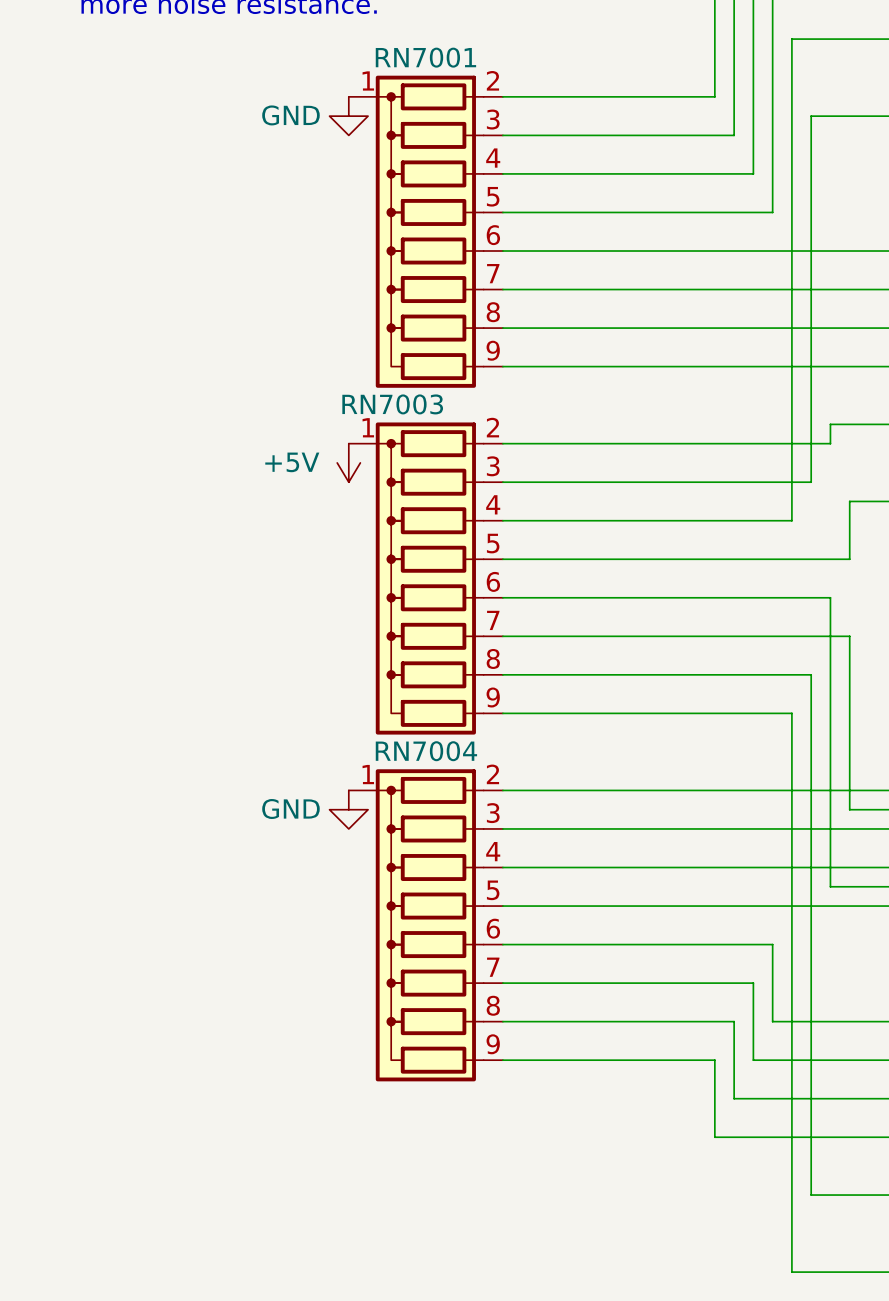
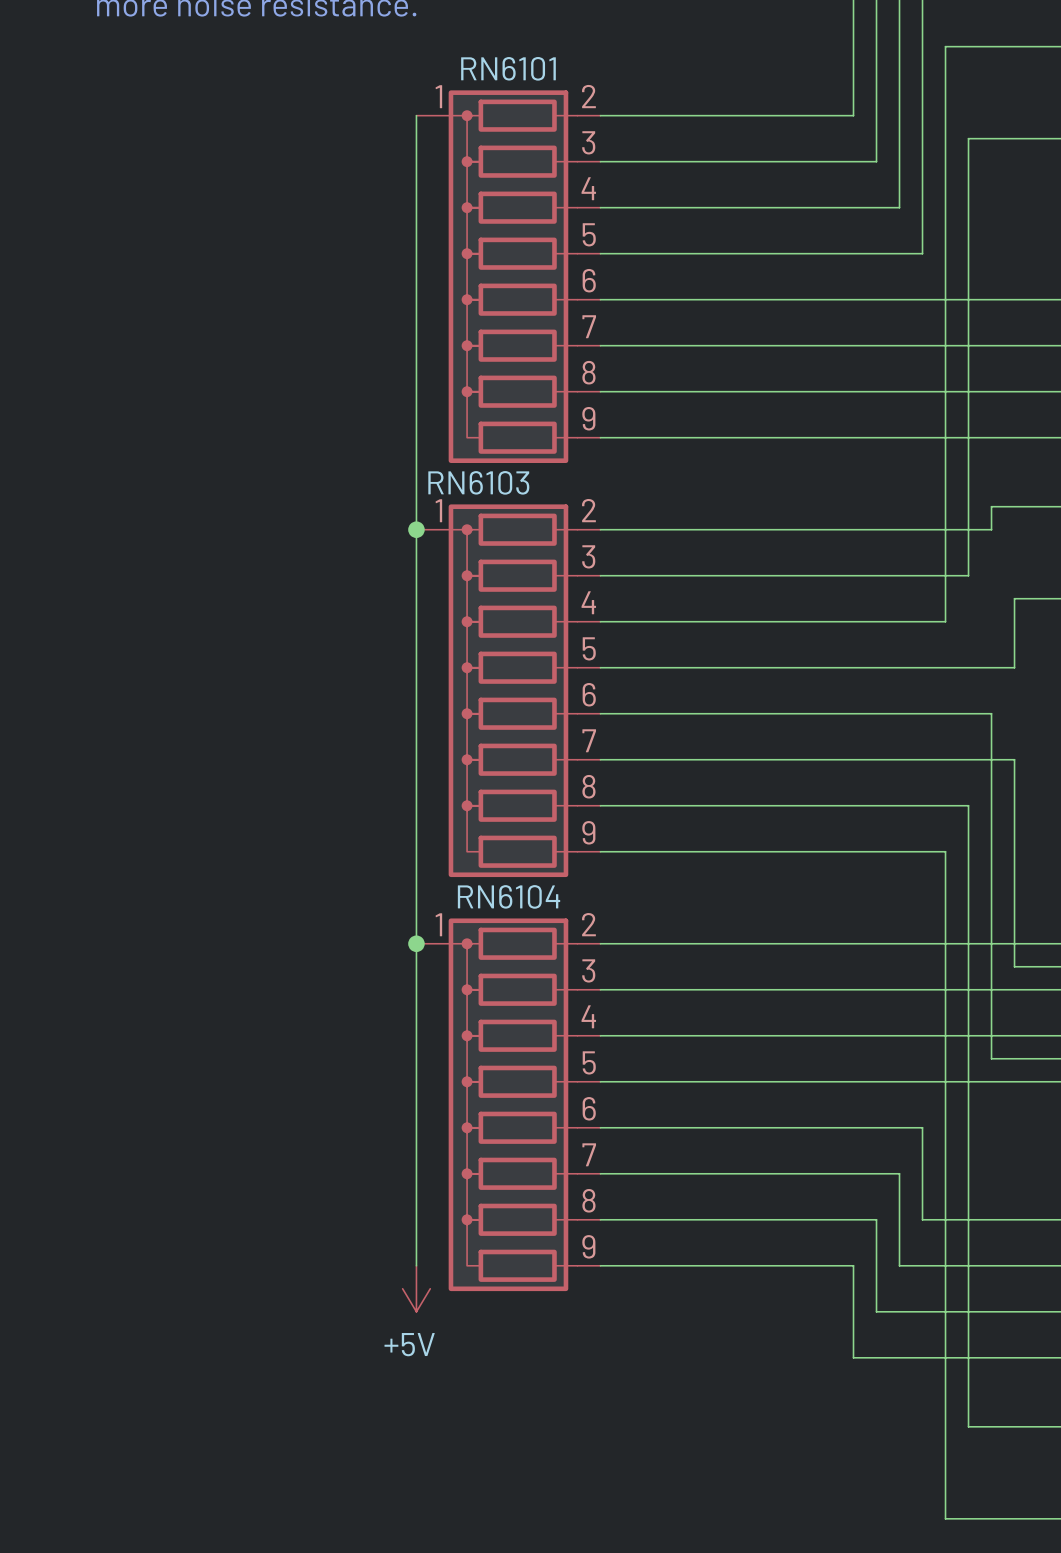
RN7001 name: RN7001 (425, 57) -> RN6101 (508, 68)
wire: none -> (416, 115) (416, 1265)
power symbol: GND (348, 116) -> none
RN7003 name: RN7003 (392, 404) -> RN6103 (478, 482)
junction: none -> (416, 529)
power symbol: +5V (348, 462) -> none
RN7004 name: RN7004 (426, 751) -> RN6104 (509, 896)
junction: none -> (416, 943)
power symbol: GND (348, 809) -> none
power symbol: none -> +5V (416, 1288)

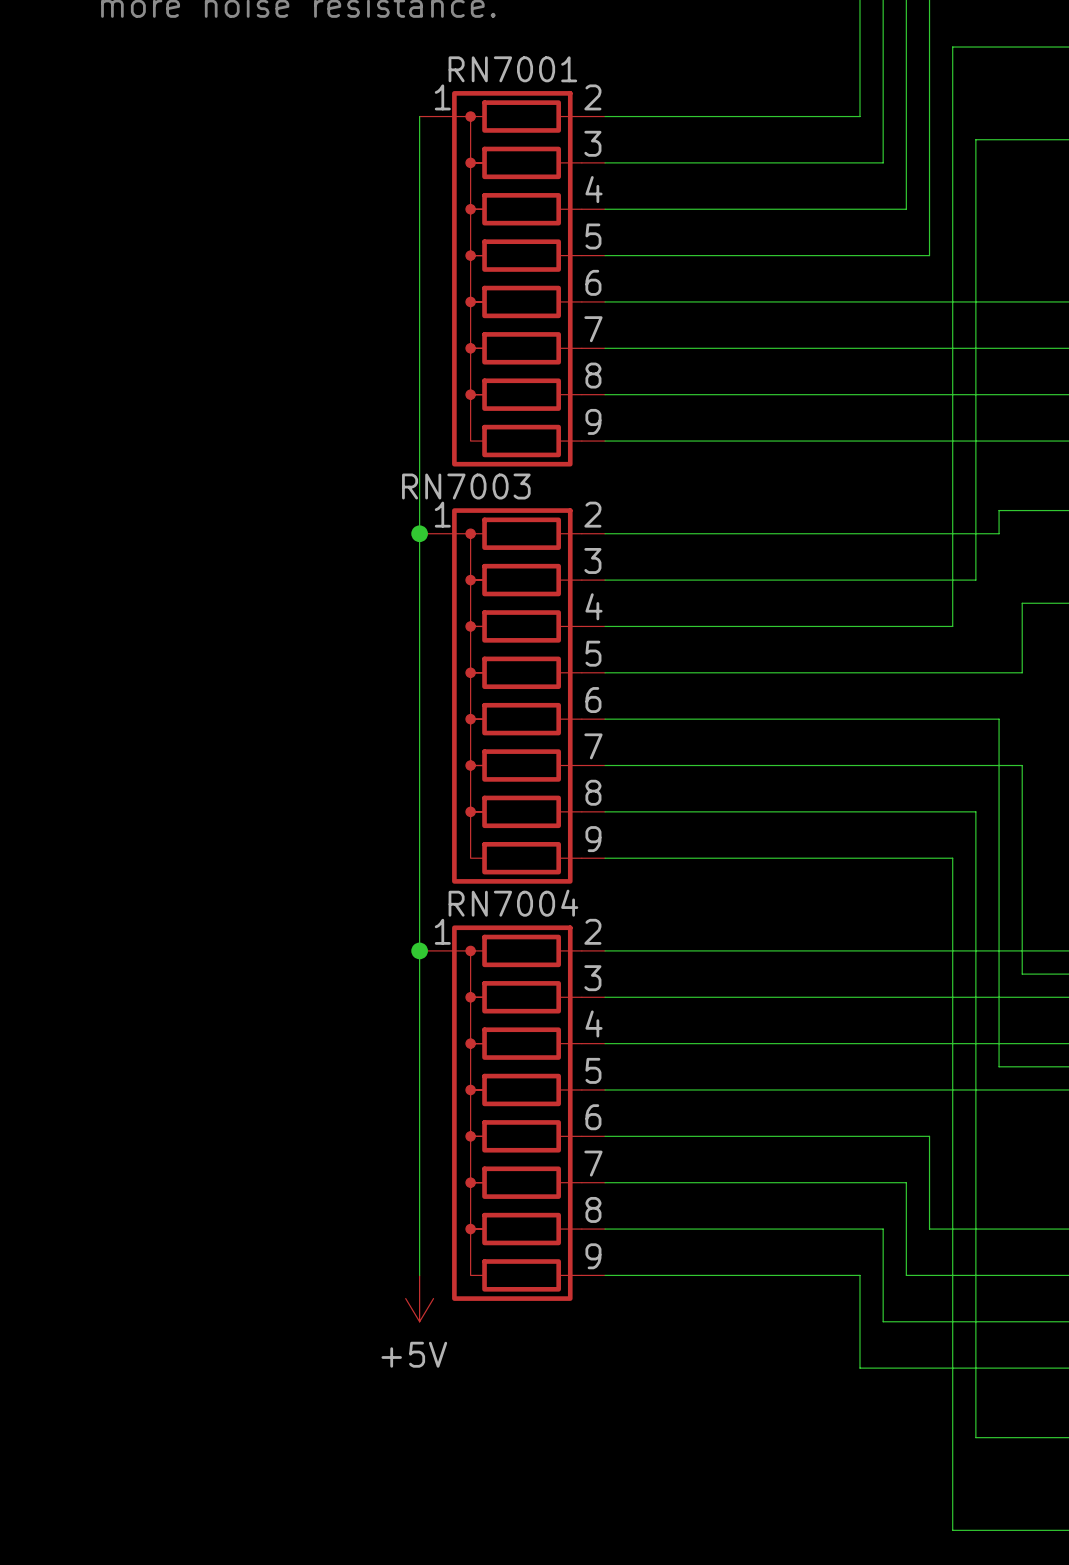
RN6101 name: RN6101 (508, 68) -> RN7001 (512, 69)
RN6103 name: RN6103 (478, 482) -> RN7003 (466, 486)
RN6104 name: RN6104 (509, 896) -> RN7004 (513, 903)

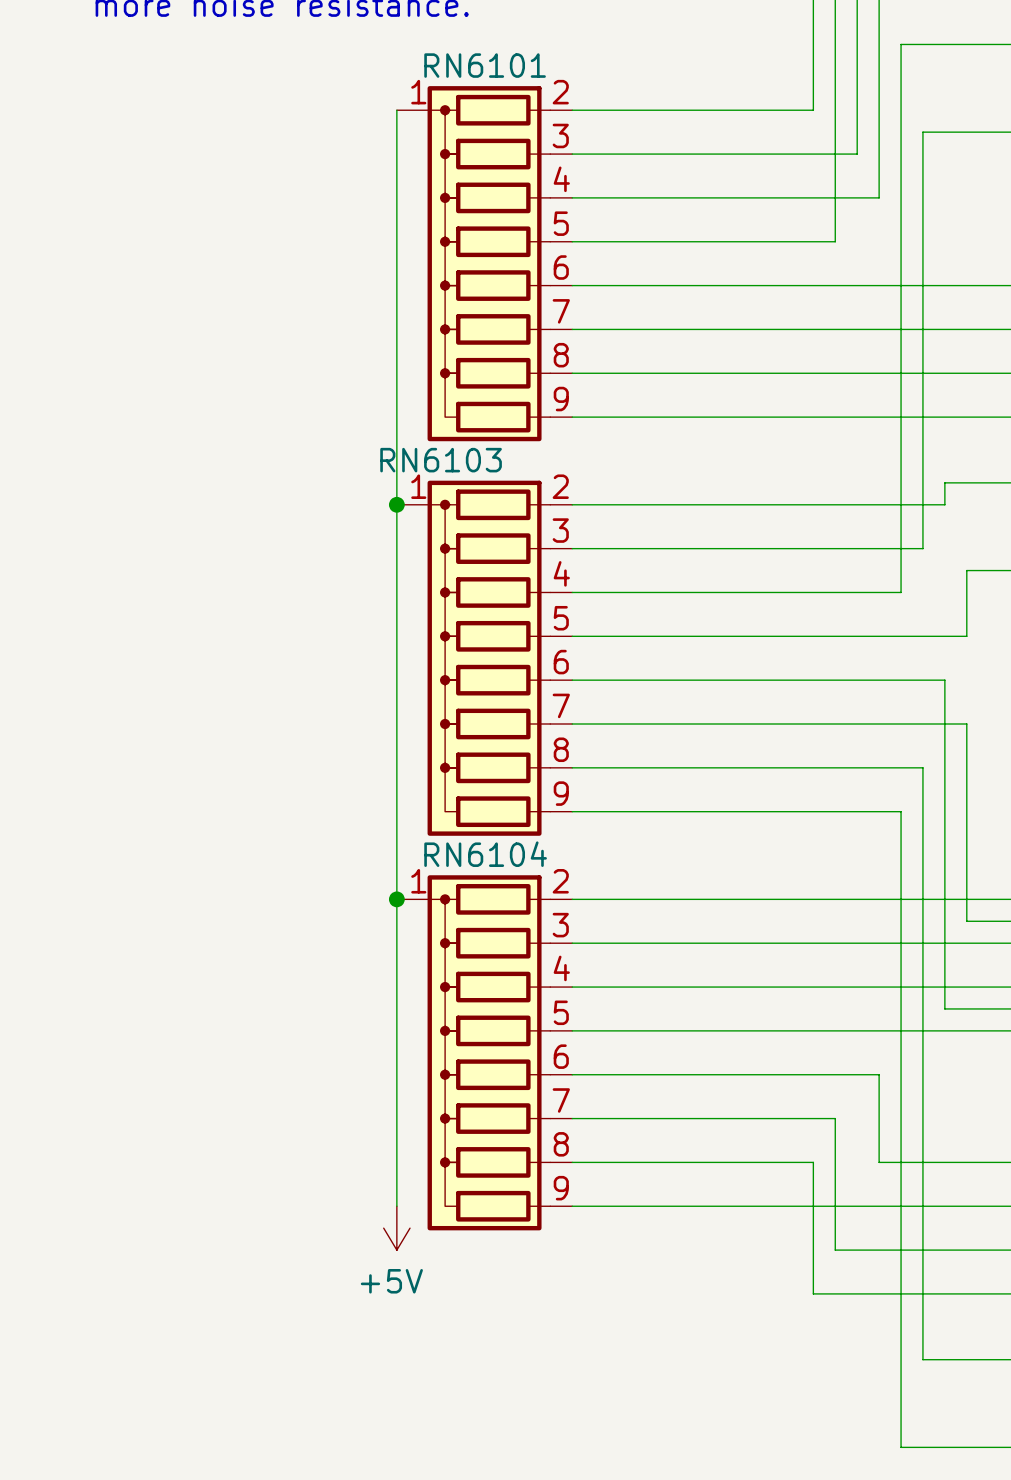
RN7001 name: RN7001 (512, 69) -> RN6101 (485, 65)
wire: (906, 162) (906, 209) -> (879, 197) (857, 197)
wire: (929, 209) (929, 255) (883, 255) -> (857, 154) (835, 154) (835, 241)
RN7003 name: RN7003 (466, 486) -> RN6103 (441, 460)
RN7004 name: RN7004 (513, 903) -> RN6104 (485, 854)
wire: (883, 1182) (906, 1182) (906, 1275) -> (835, 1118) (835, 1162)
wire: (859, 1229) (883, 1229) -> (813, 1162) (813, 1206) (857, 1206)

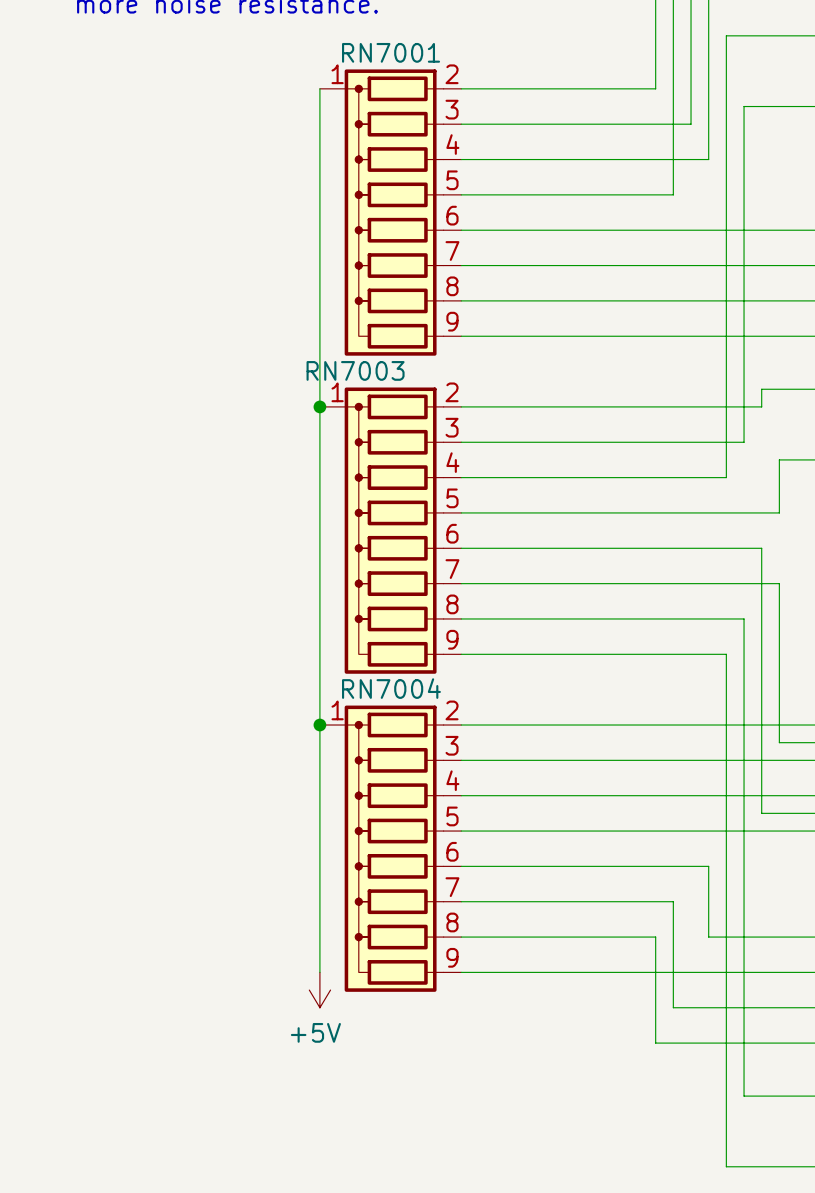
RN6101 name: RN6101 (485, 65) -> RN7001 (391, 52)
RN6103 name: RN6103 (441, 460) -> RN7003 (355, 370)
RN6104 name: RN6104 (485, 854) -> RN7004 (391, 688)

